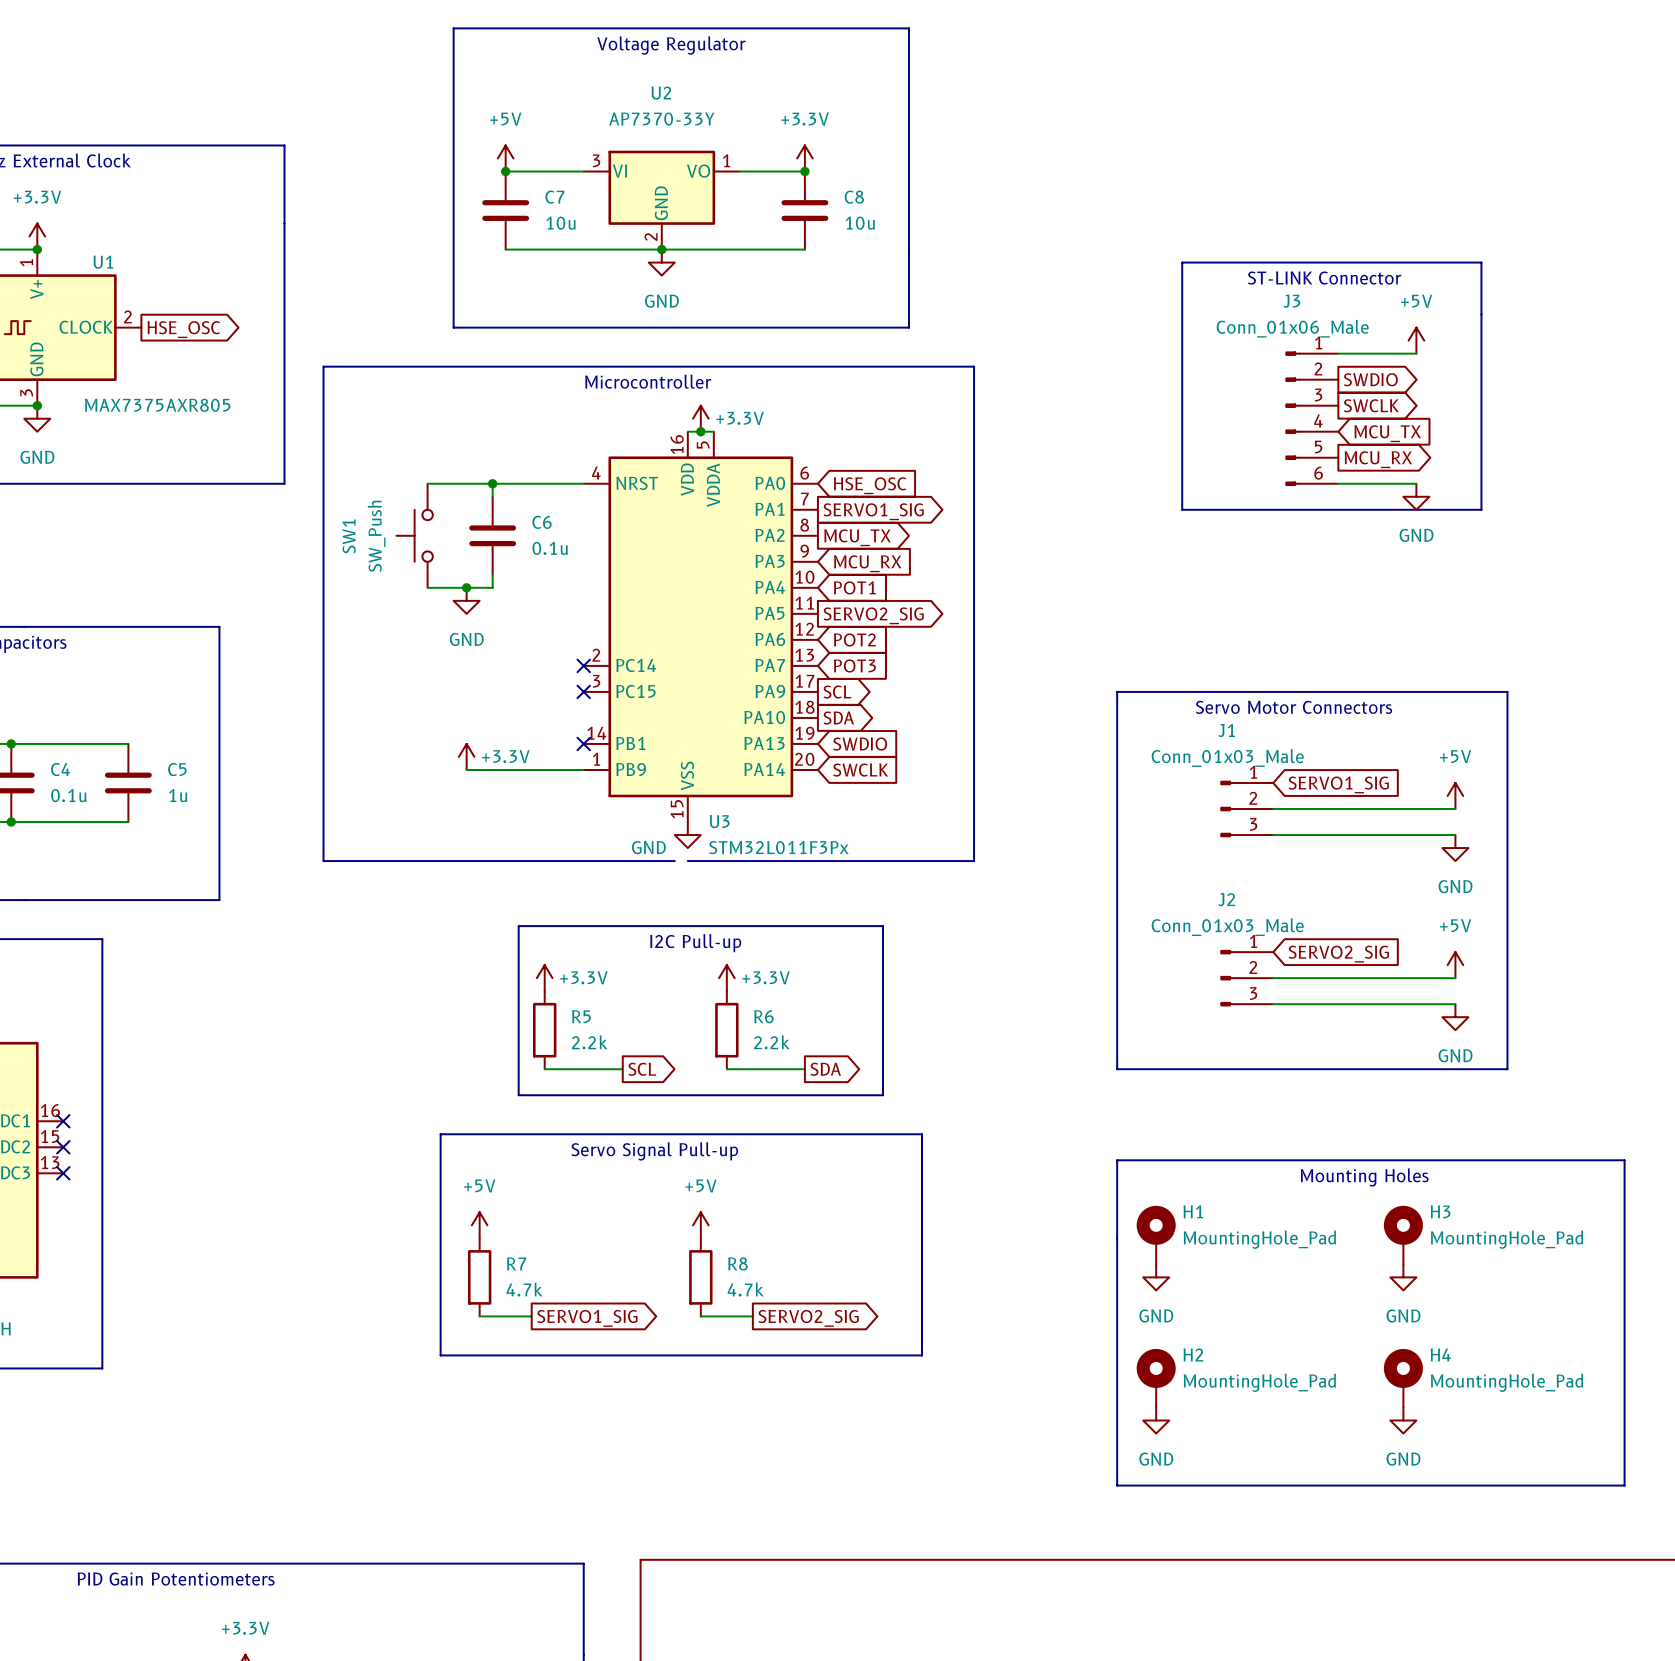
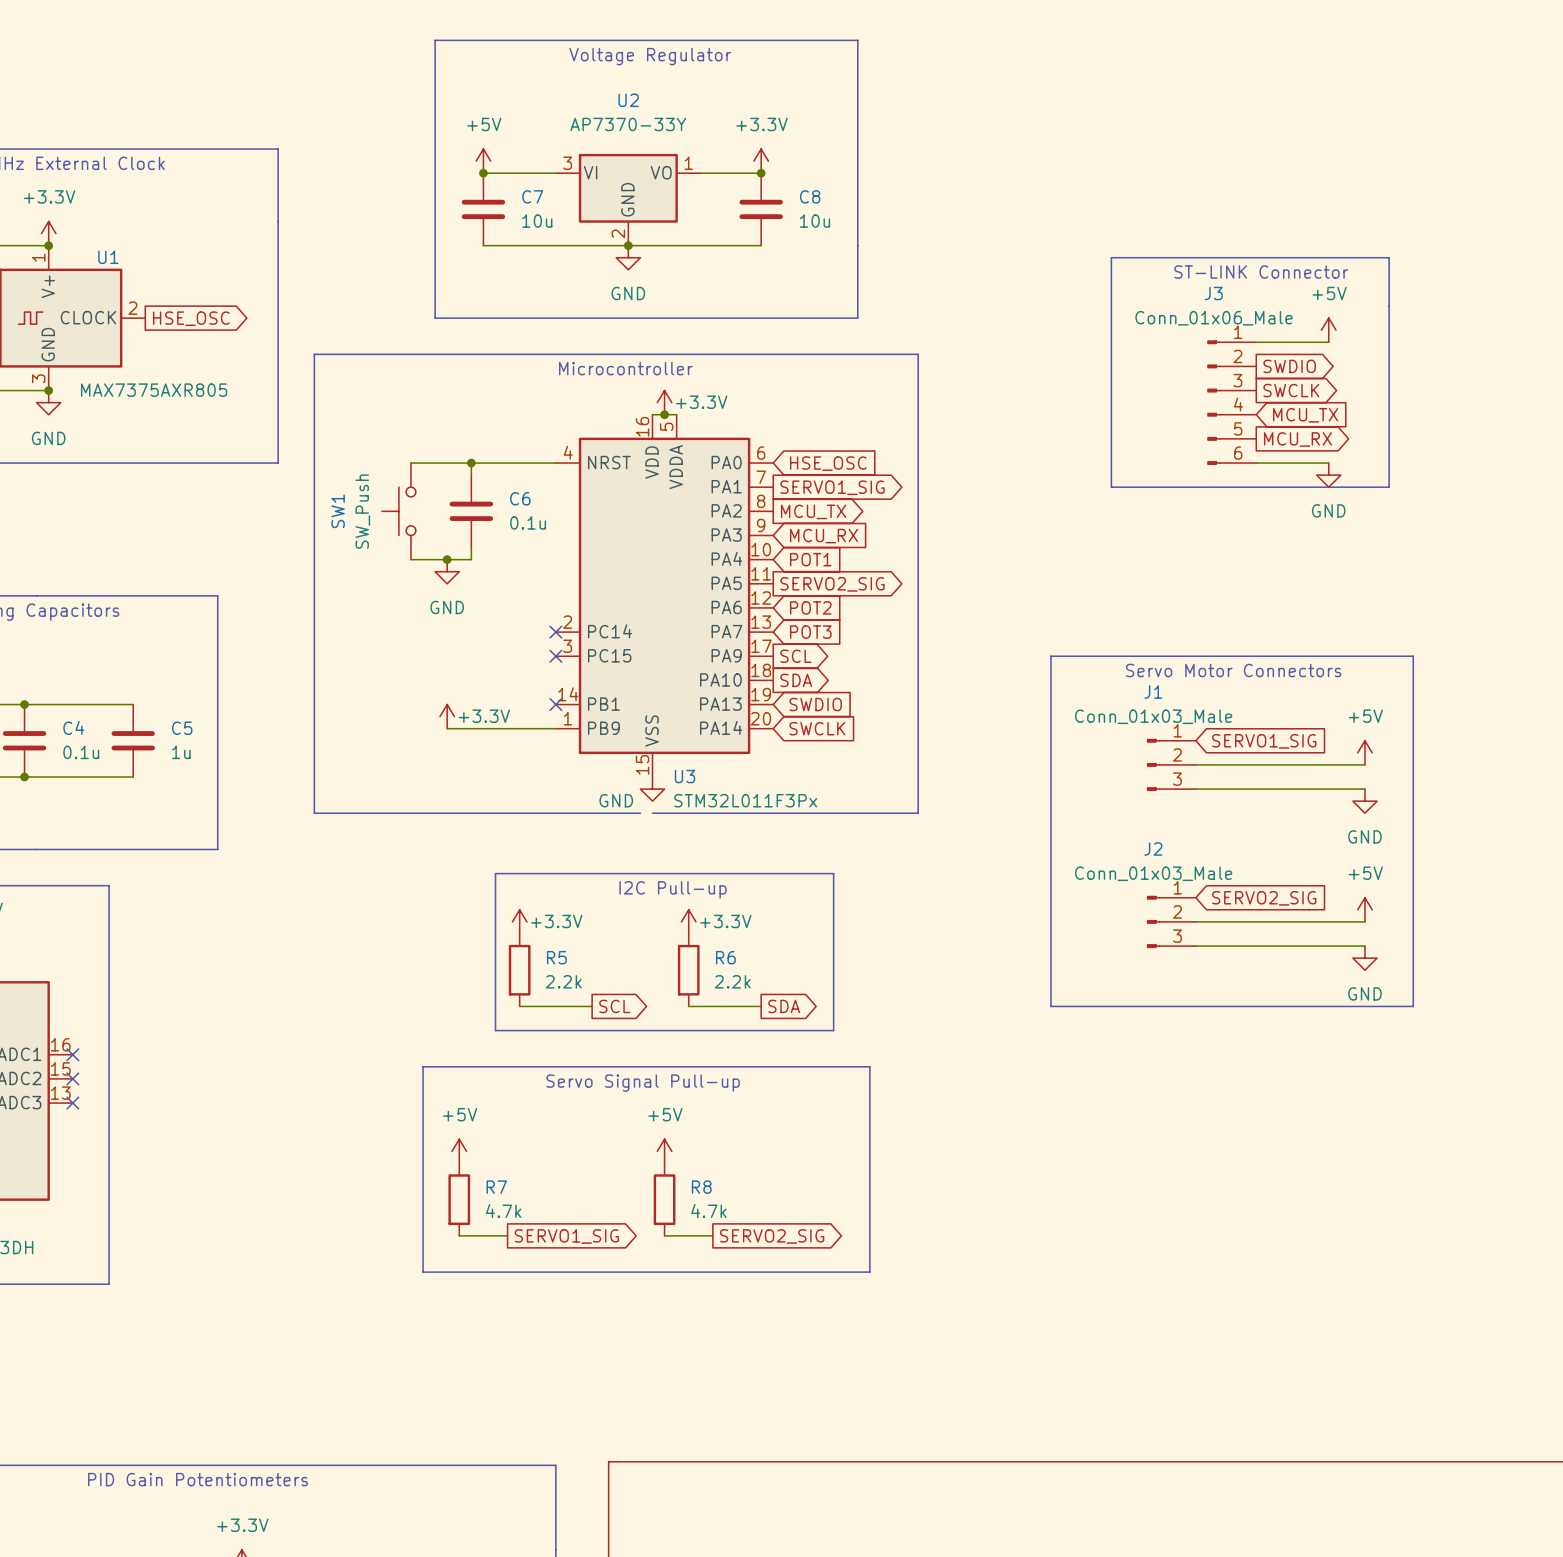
line: (1117, 1160) (1117, 1485) (1624, 1485) (1624, 1160) (1117, 1160) -> none
text: Mounting Holes (1364, 1177) -> none
H1: MountingHole_Pad (1156, 1235) -> none
H3: MountingHole_Pad (1403, 1235) -> none
power symbol: GND (1156, 1277) -> none
power symbol: GND (1403, 1277) -> none
H2: MountingHole_Pad (1156, 1378) -> none
H4: MountingHole_Pad (1403, 1378) -> none
power symbol: GND (1156, 1420) -> none
power symbol: GND (1403, 1420) -> none

